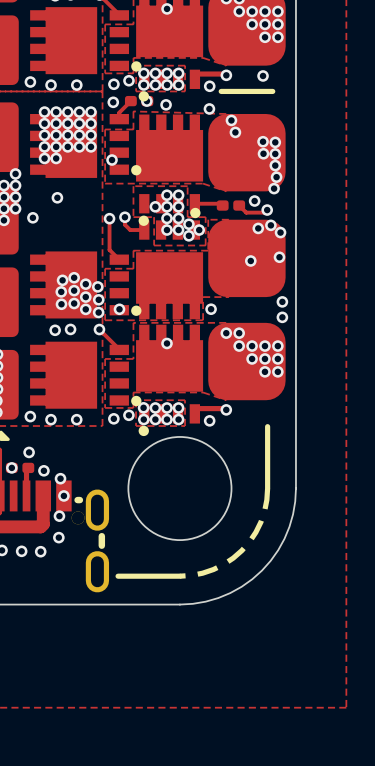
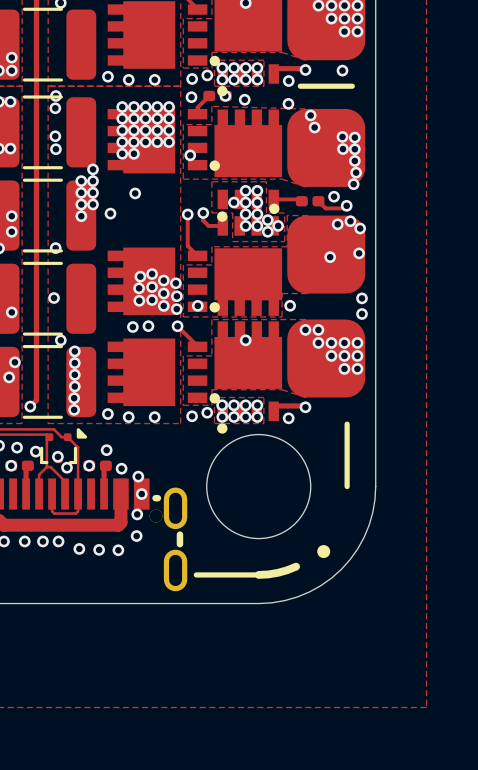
line: (267, 488) (260, 522) (241, 550) (213, 569) (179, 576) -> (296, 566) (277, 572) (258, 574)
drawing: none -> [317, 545, 331, 559]

